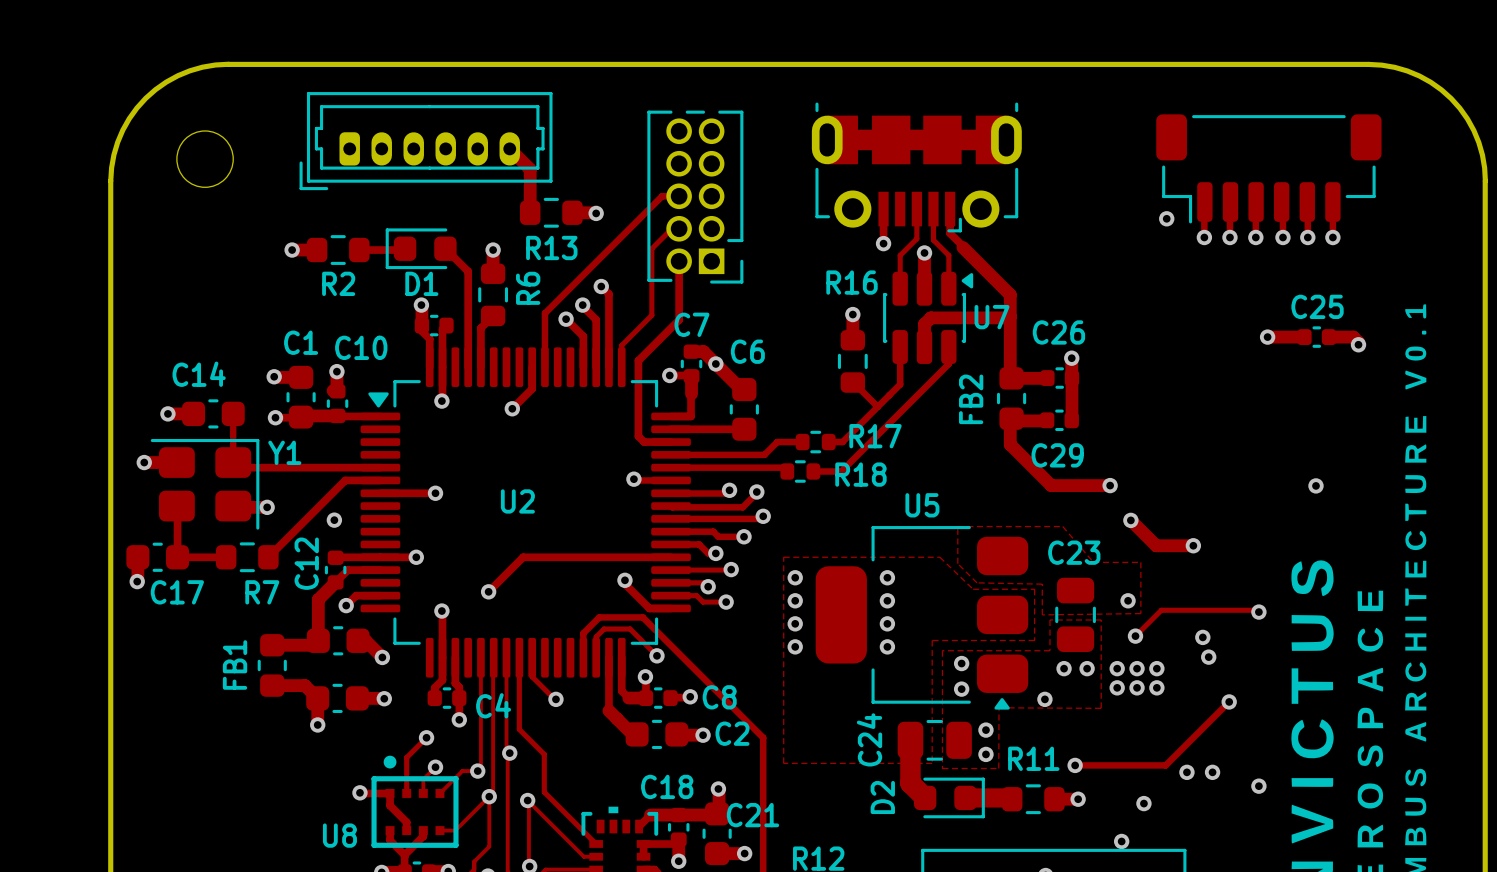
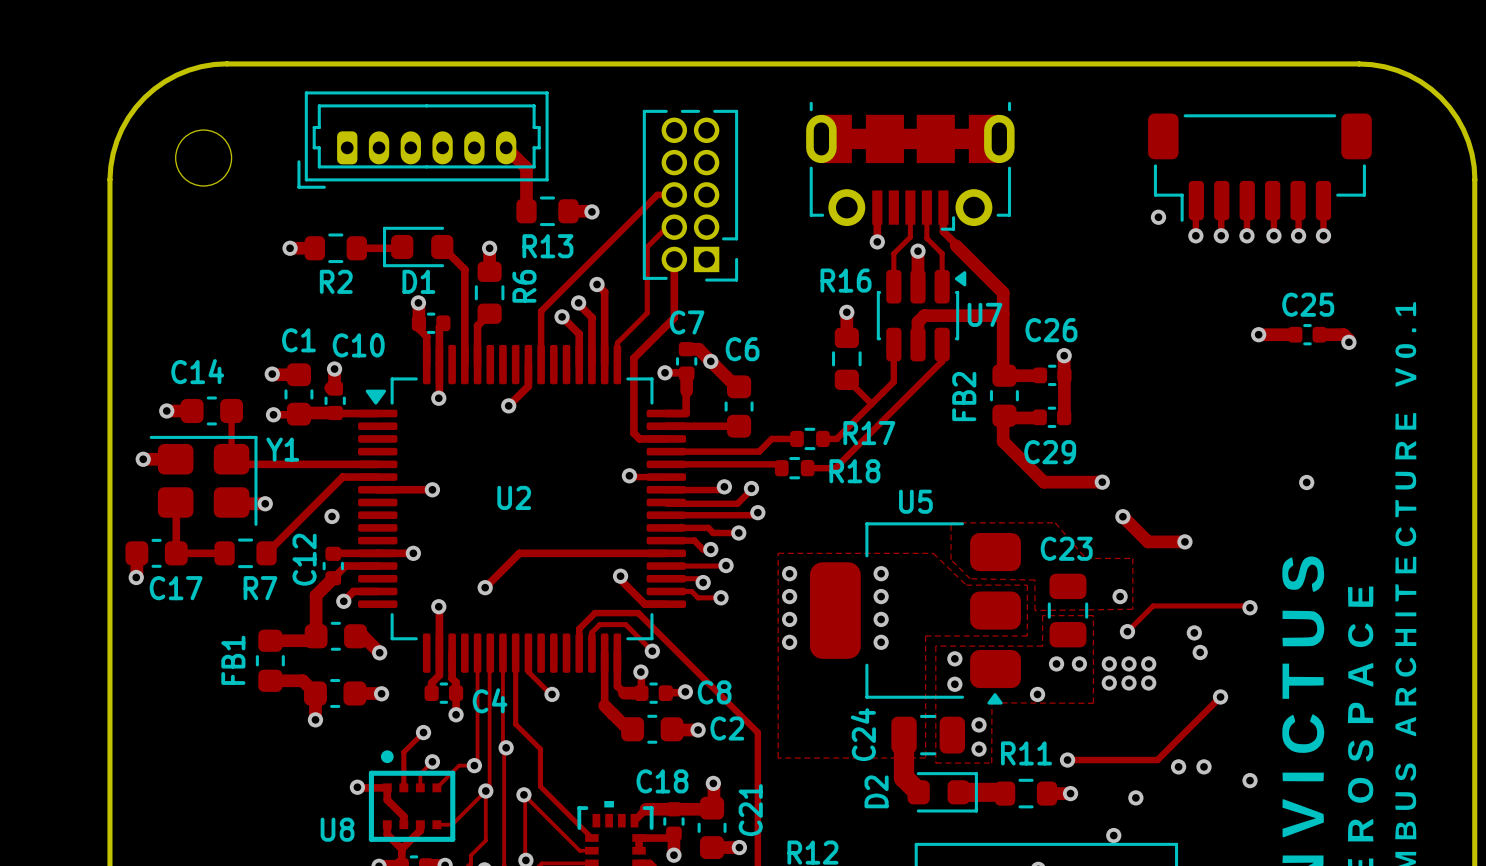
C21 name rotation: 0° (752, 815) -> 90° counterclockwise (750, 810)

